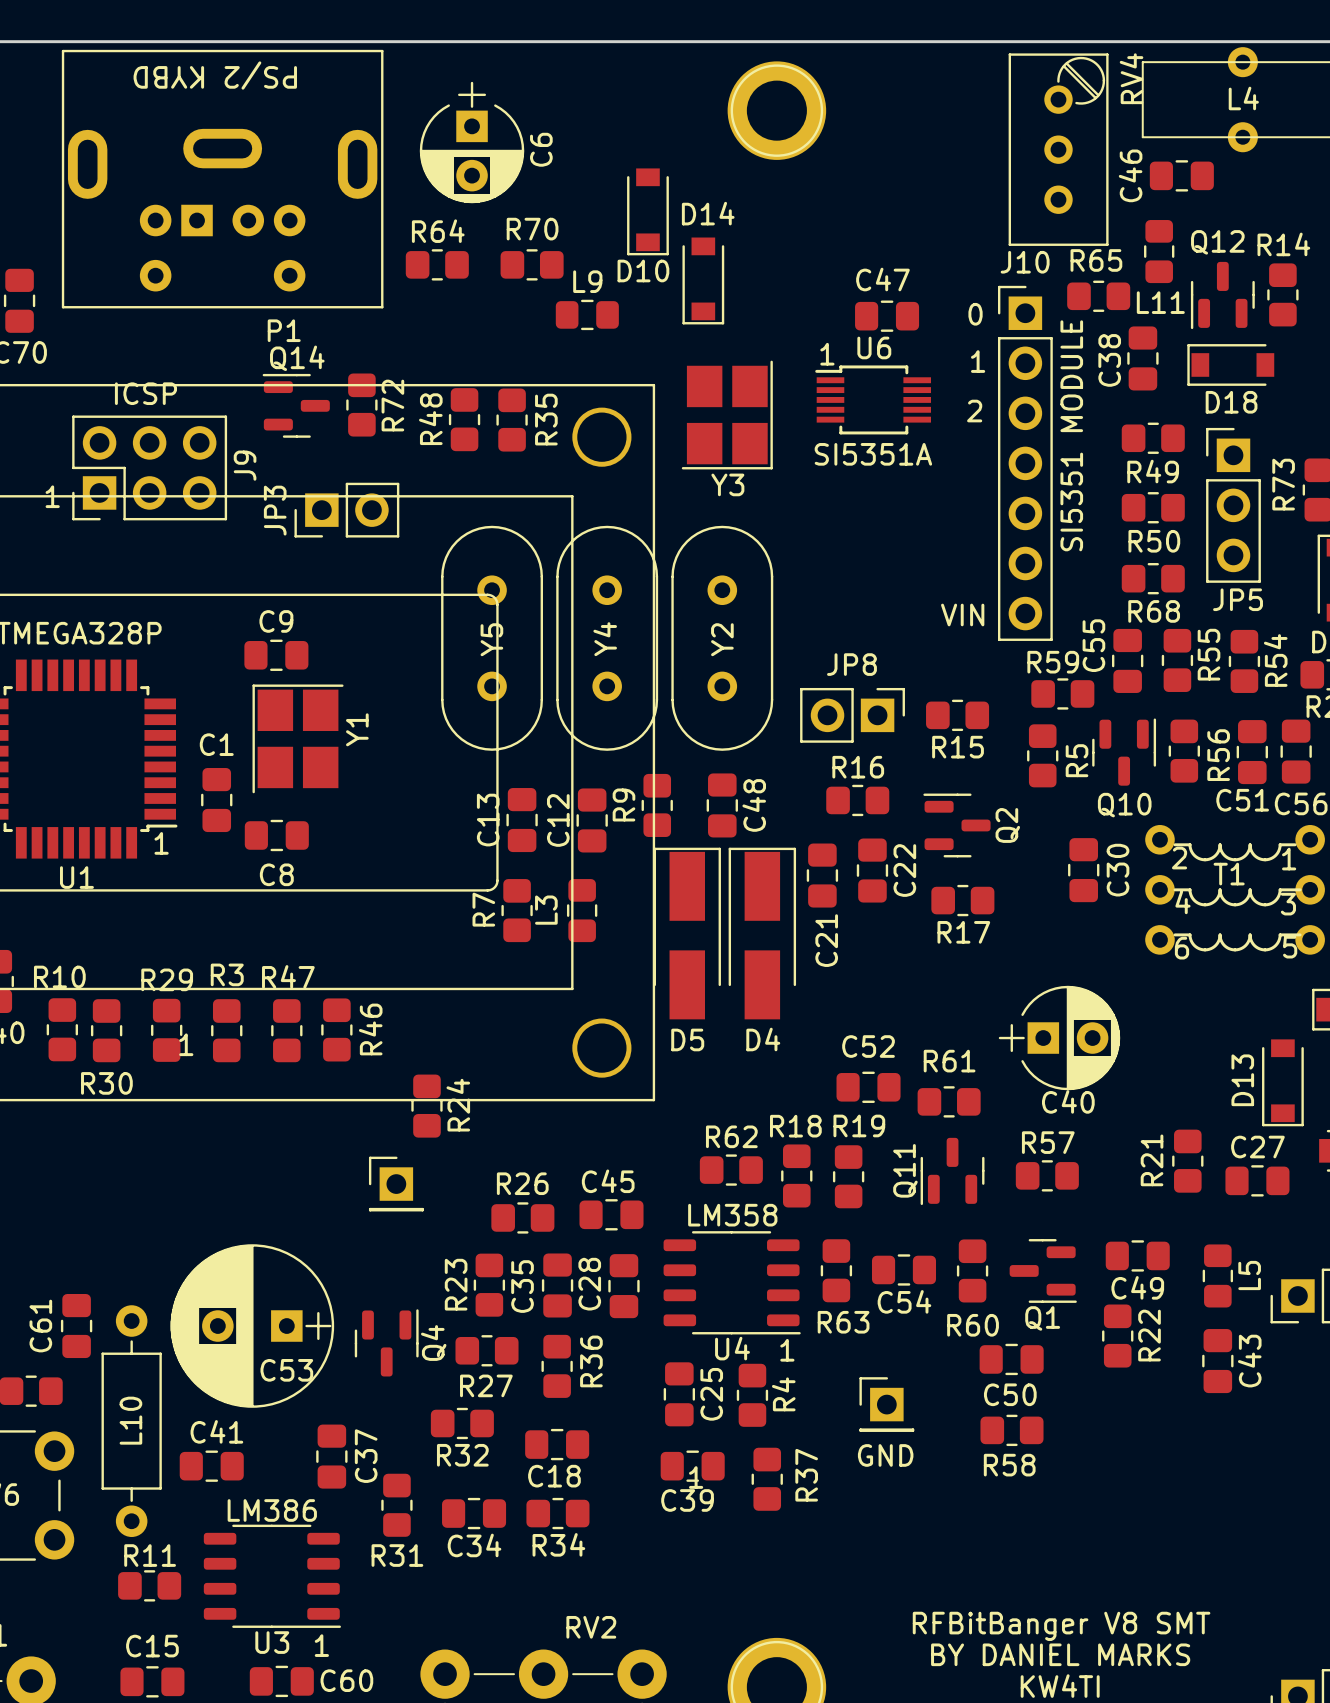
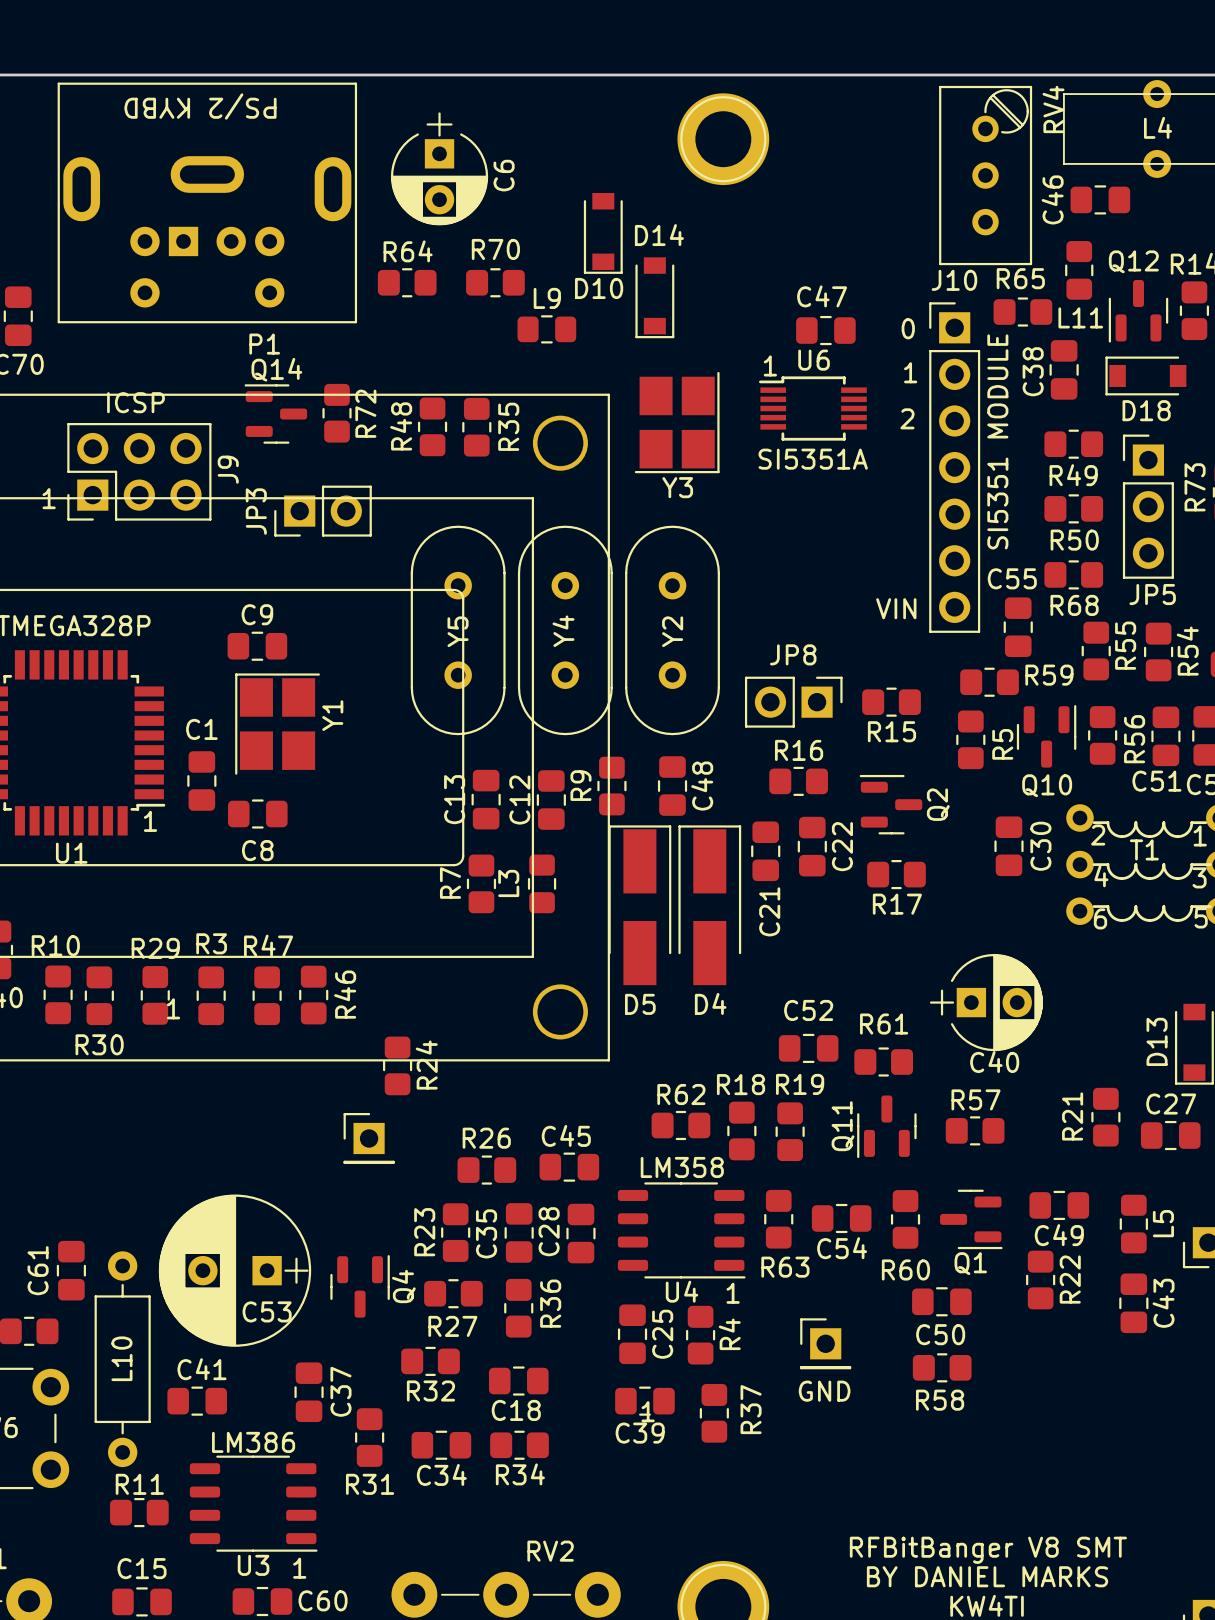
C55 name rotation: 0° (1093, 645) -> 90° clockwise (1012, 578)
C55 position: (1127, 660) -> (1018, 627)
R59 name position: R59 (1053, 662) -> R59 (1049, 675)

